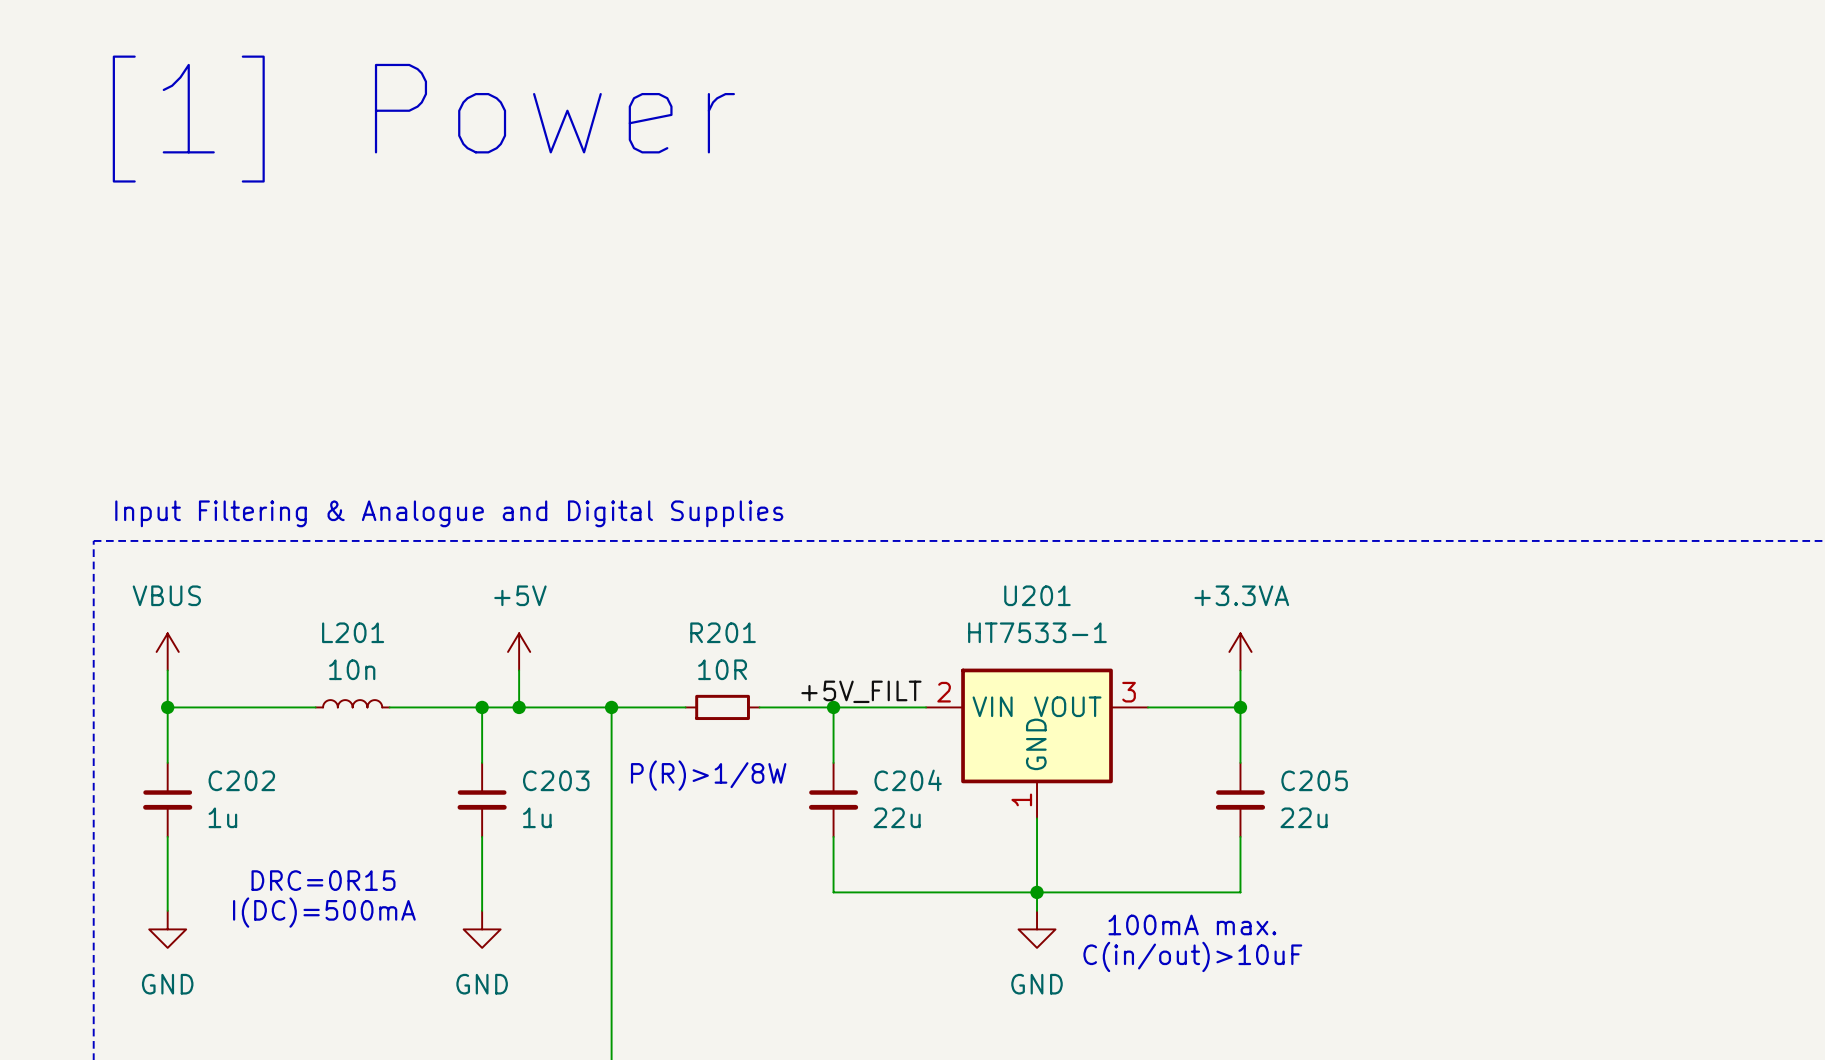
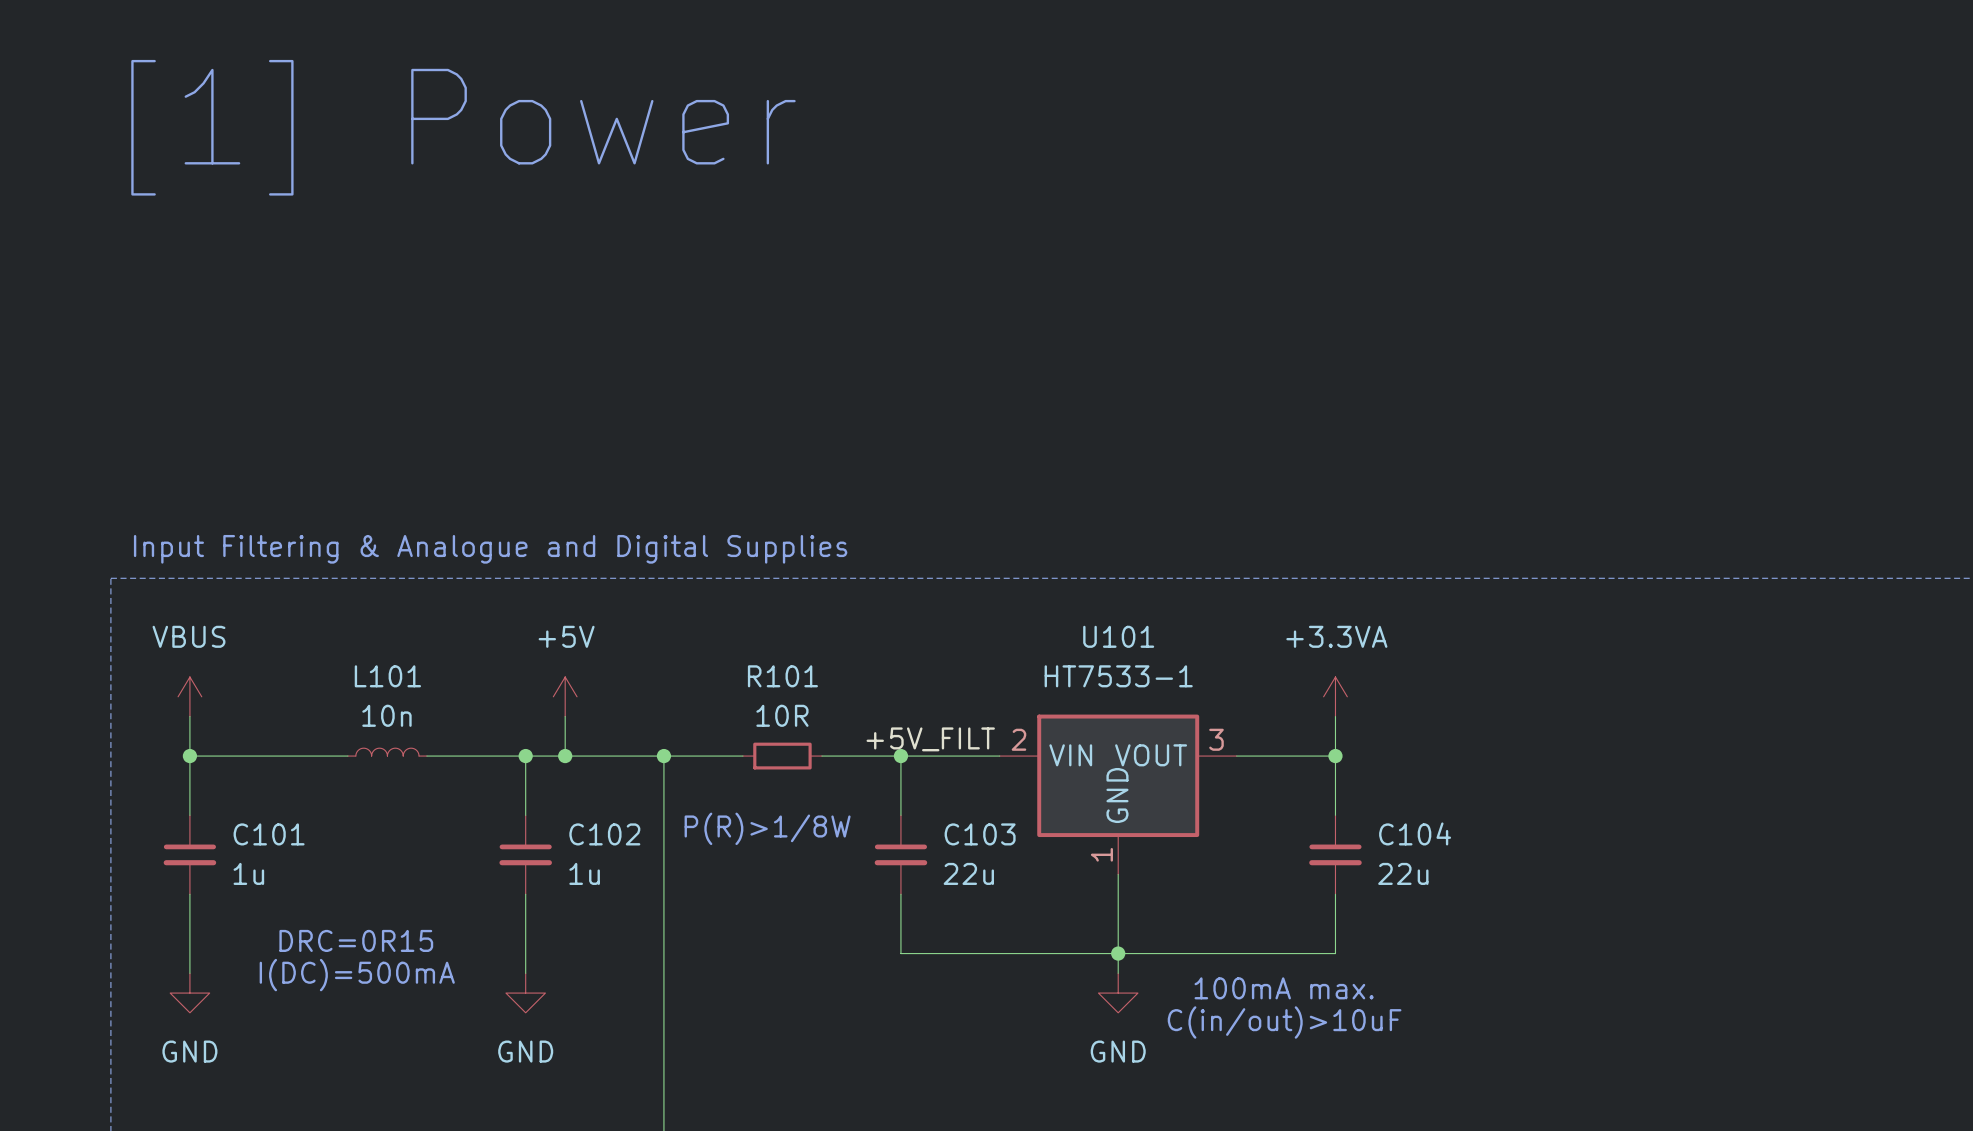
U201 name: U201 (1037, 595) -> U101 (1118, 636)
L201 name: L201 (353, 632) -> L101 (387, 676)
R201 name: R201 (723, 632) -> R101 (782, 676)
C202 name: C202 (241, 780) -> C101 (269, 834)
C203 name: C203 (556, 780) -> C102 (604, 834)
C204 name: C204 (908, 780) -> C103 (980, 834)
C205 name: C205 (1314, 780) -> C104 (1415, 833)

